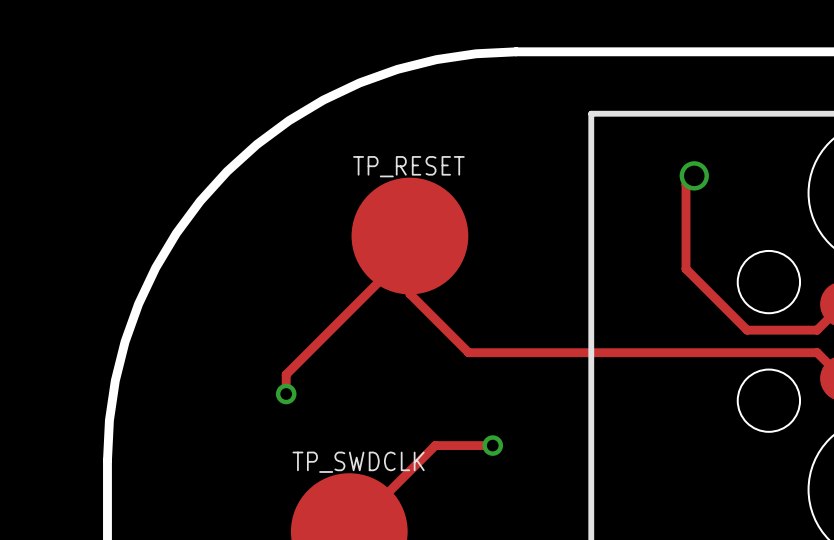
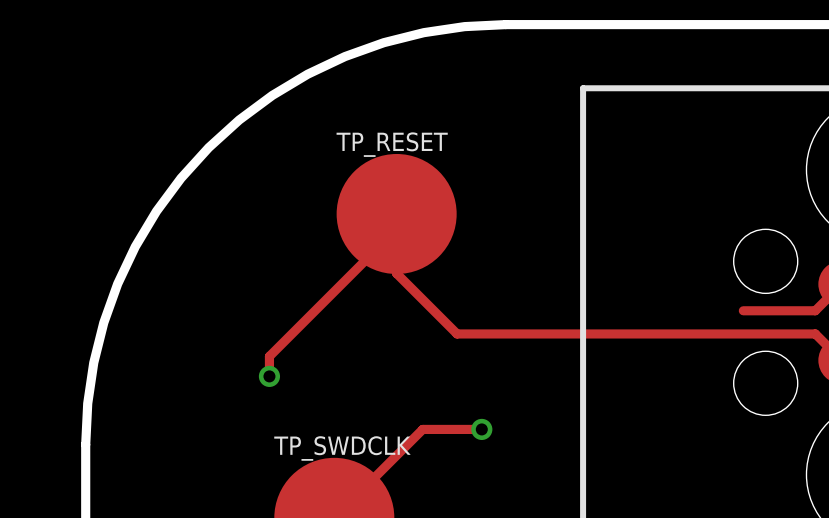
track: (694, 175) (686, 184) (686, 269) (747, 330) -> none
via: (694, 175) -> none

